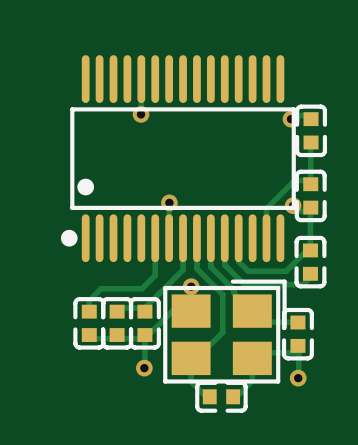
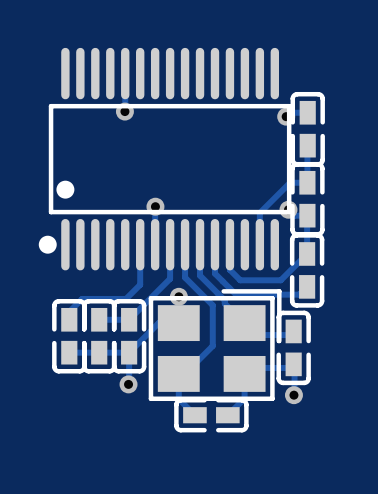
part footprint: [295, 104, 328, 158] -> [290, 91, 325, 167]
part footprint: [294, 169, 327, 223] -> [290, 161, 325, 237]
part footprint: [294, 235, 327, 289] -> [289, 233, 325, 308]
part footprint: [73, 297, 106, 350] -> [52, 298, 87, 374]
part footprint: [101, 297, 134, 350] -> [82, 298, 117, 374]
part footprint: [128, 297, 161, 350] -> [111, 298, 147, 374]
part footprint: [281, 307, 314, 361] -> [276, 310, 311, 386]
part footprint: [195, 380, 248, 413] -> [174, 398, 249, 433]

